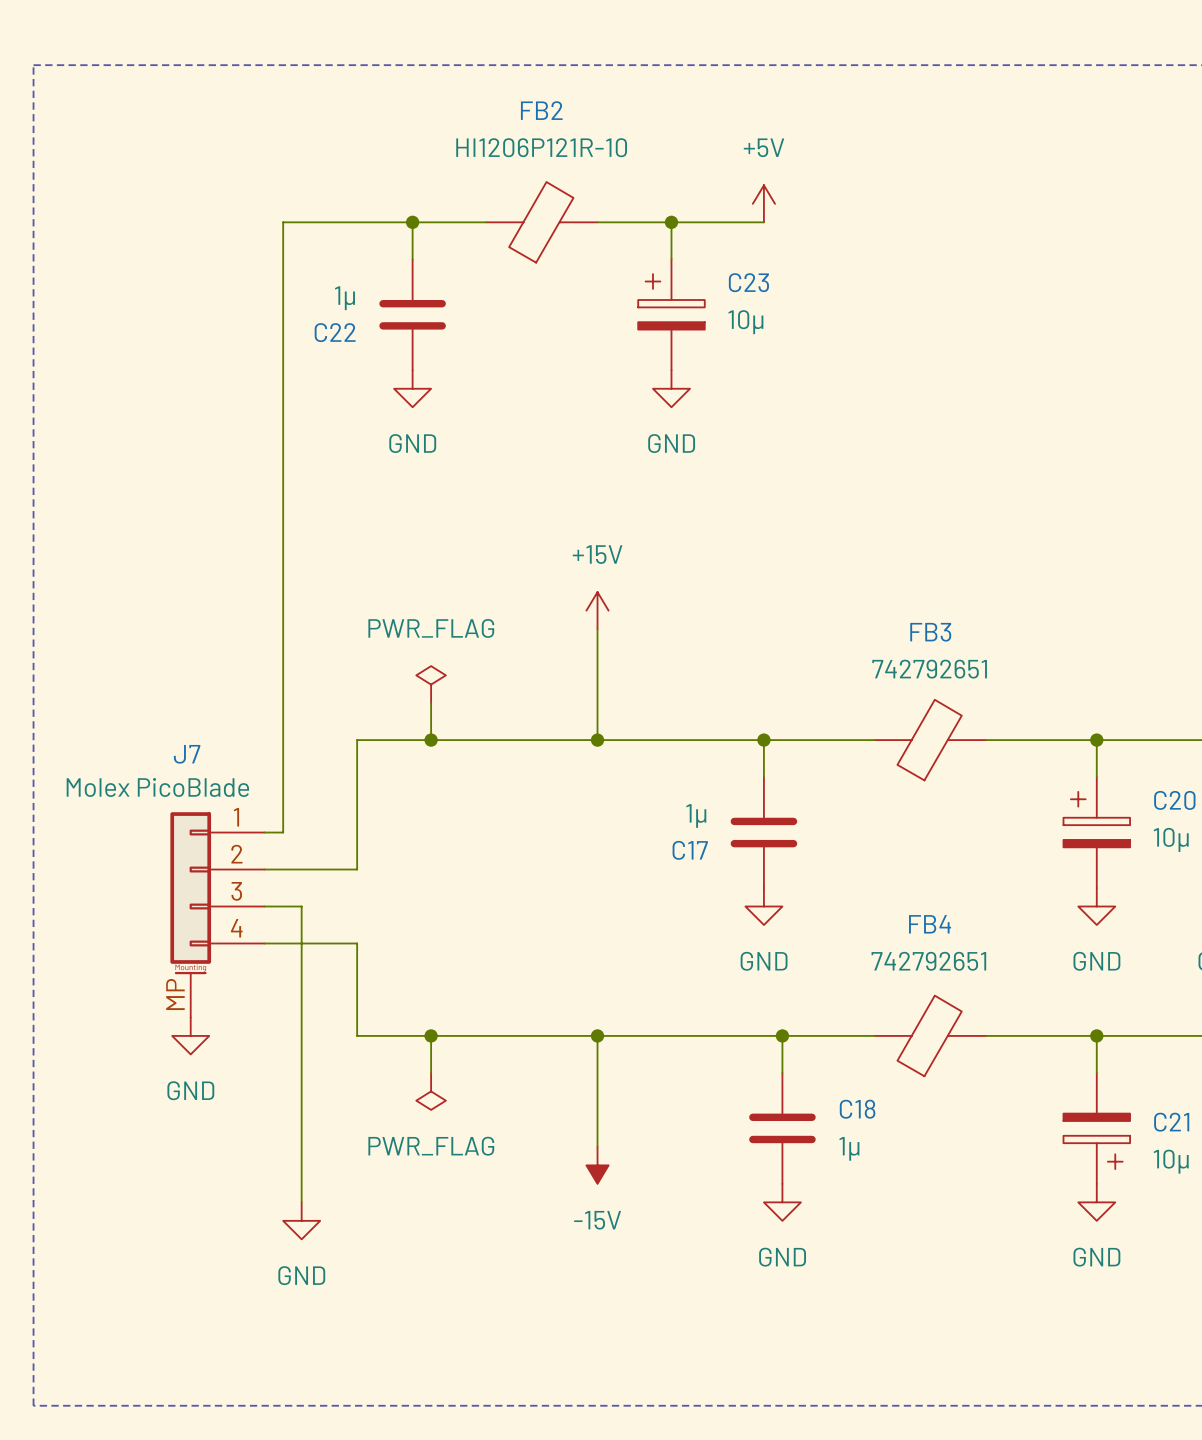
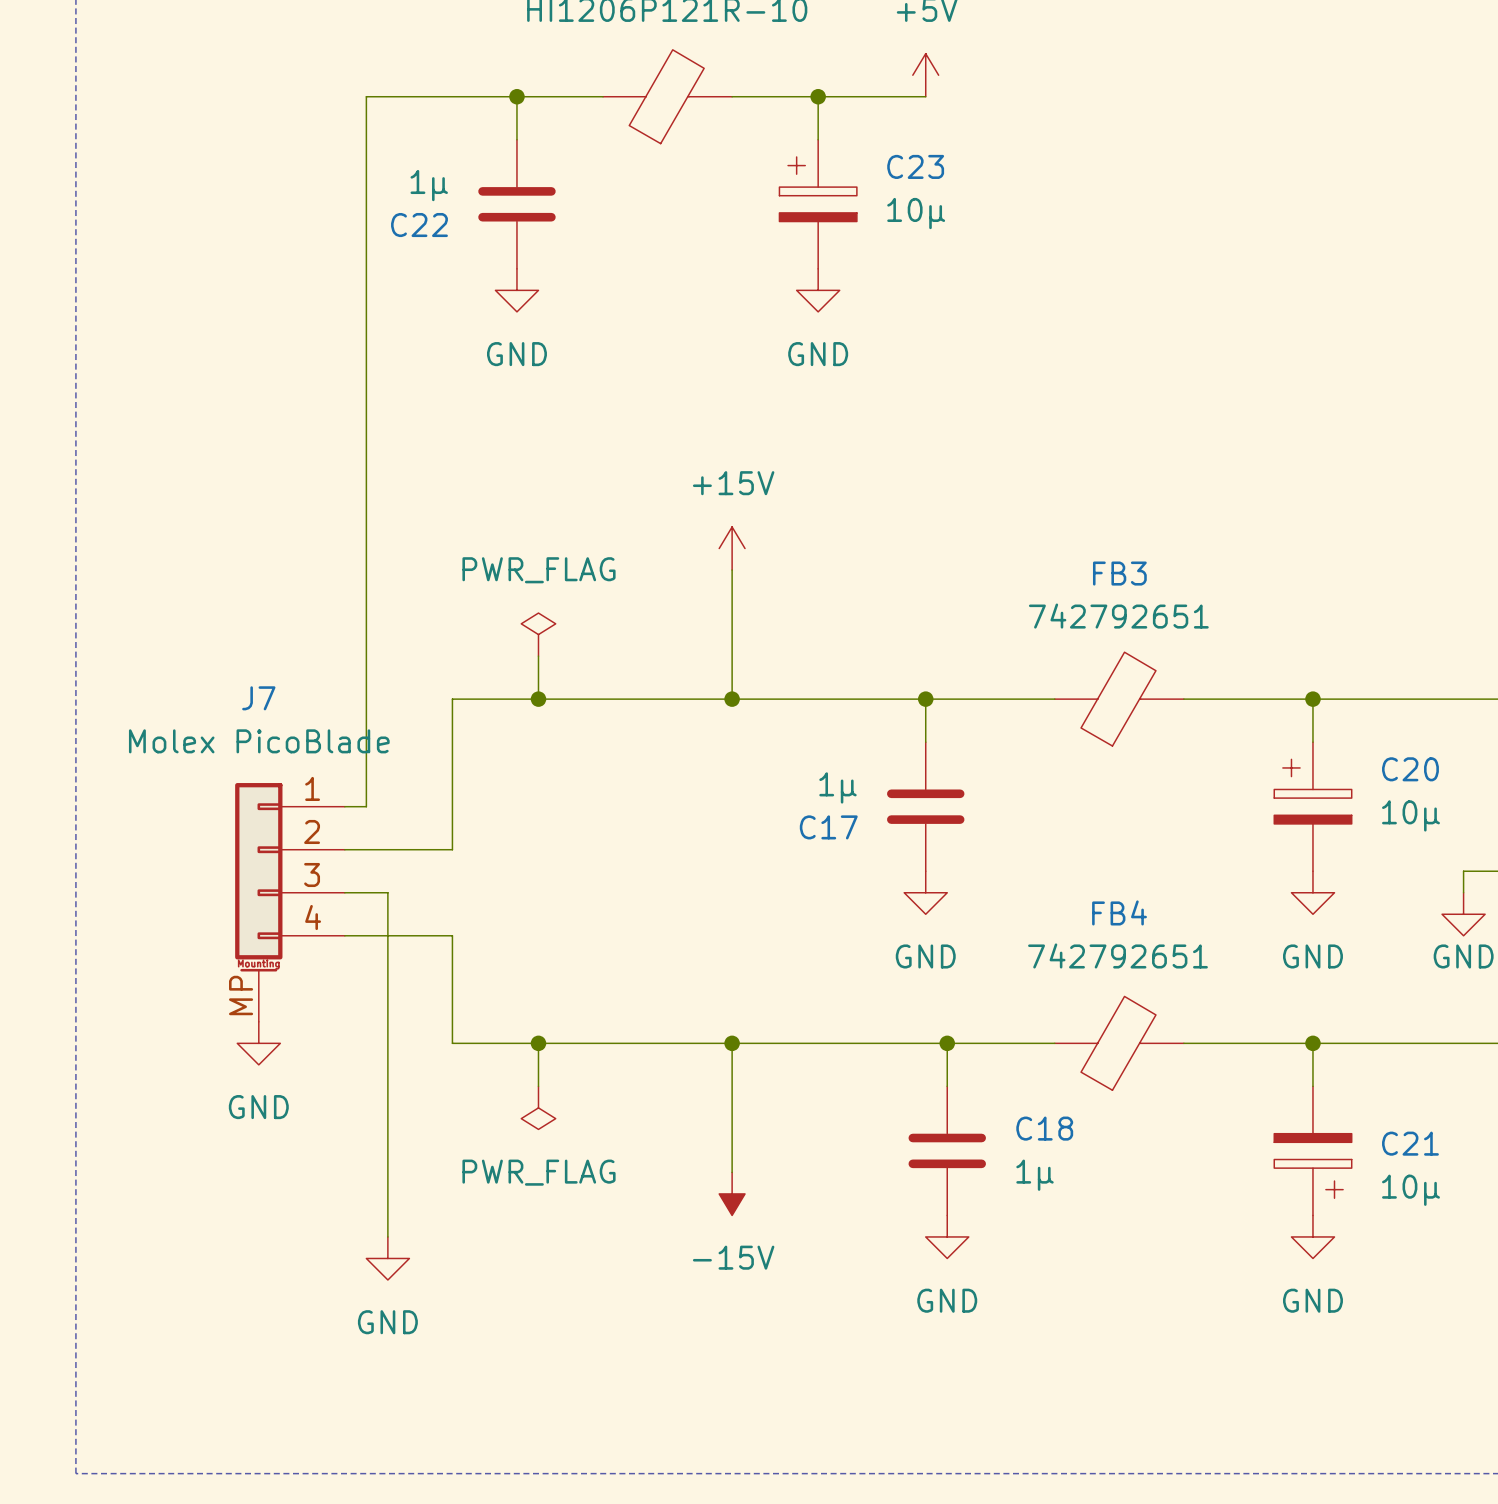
J7 name position: J7 (187, 754) -> J7 (258, 698)
J7 value position: Molex PicoBlade (157, 787) -> Molex PicoBlade (259, 741)

